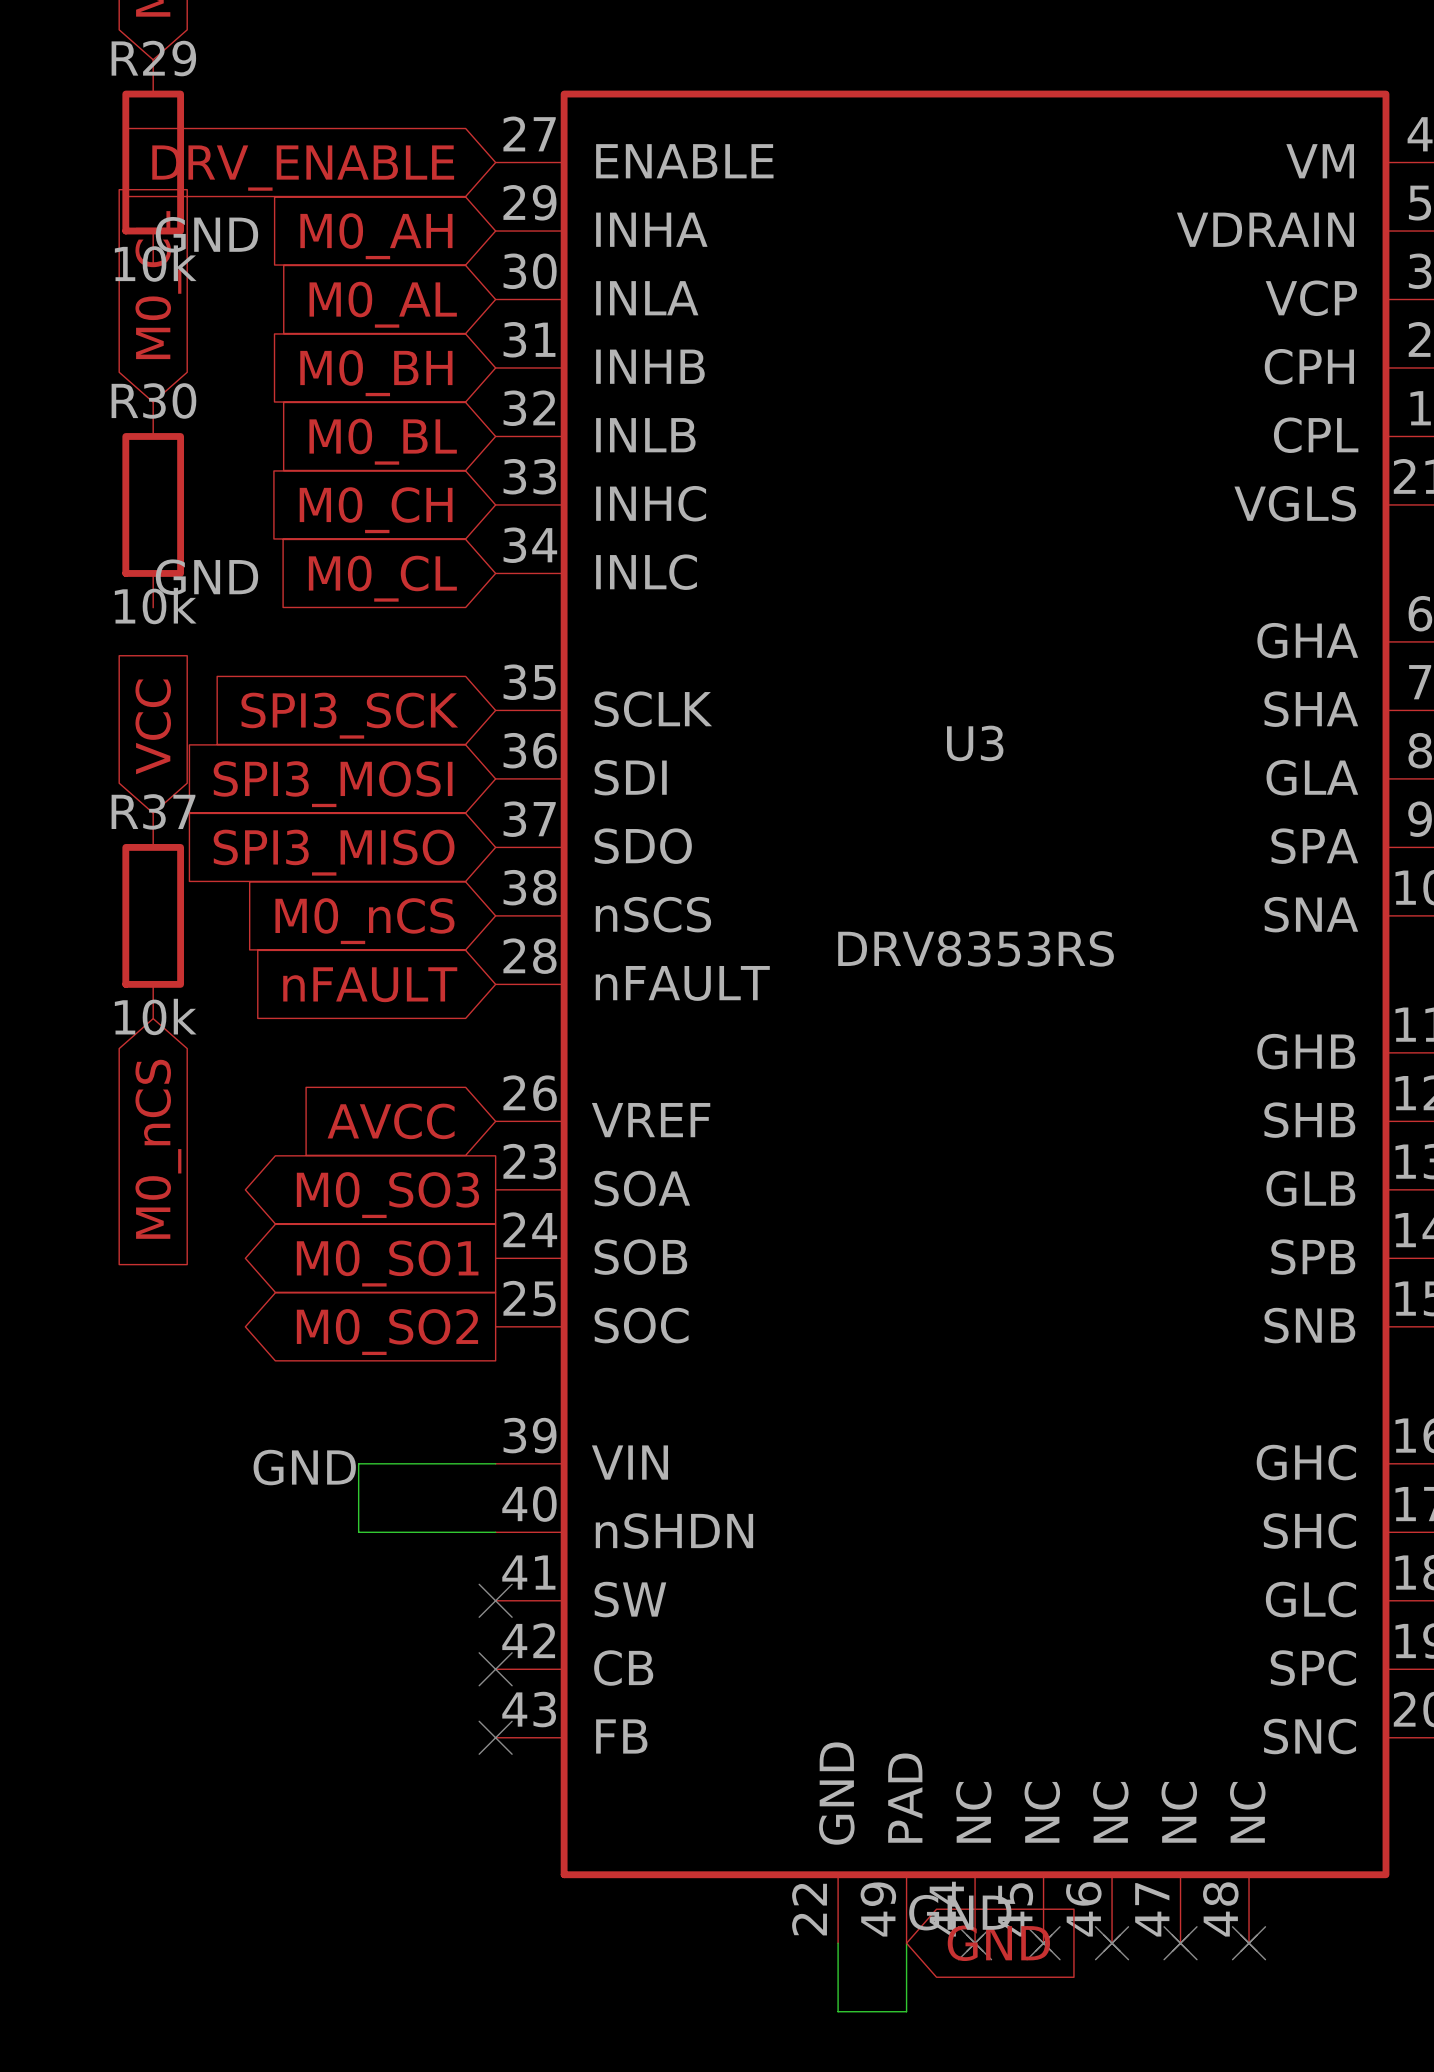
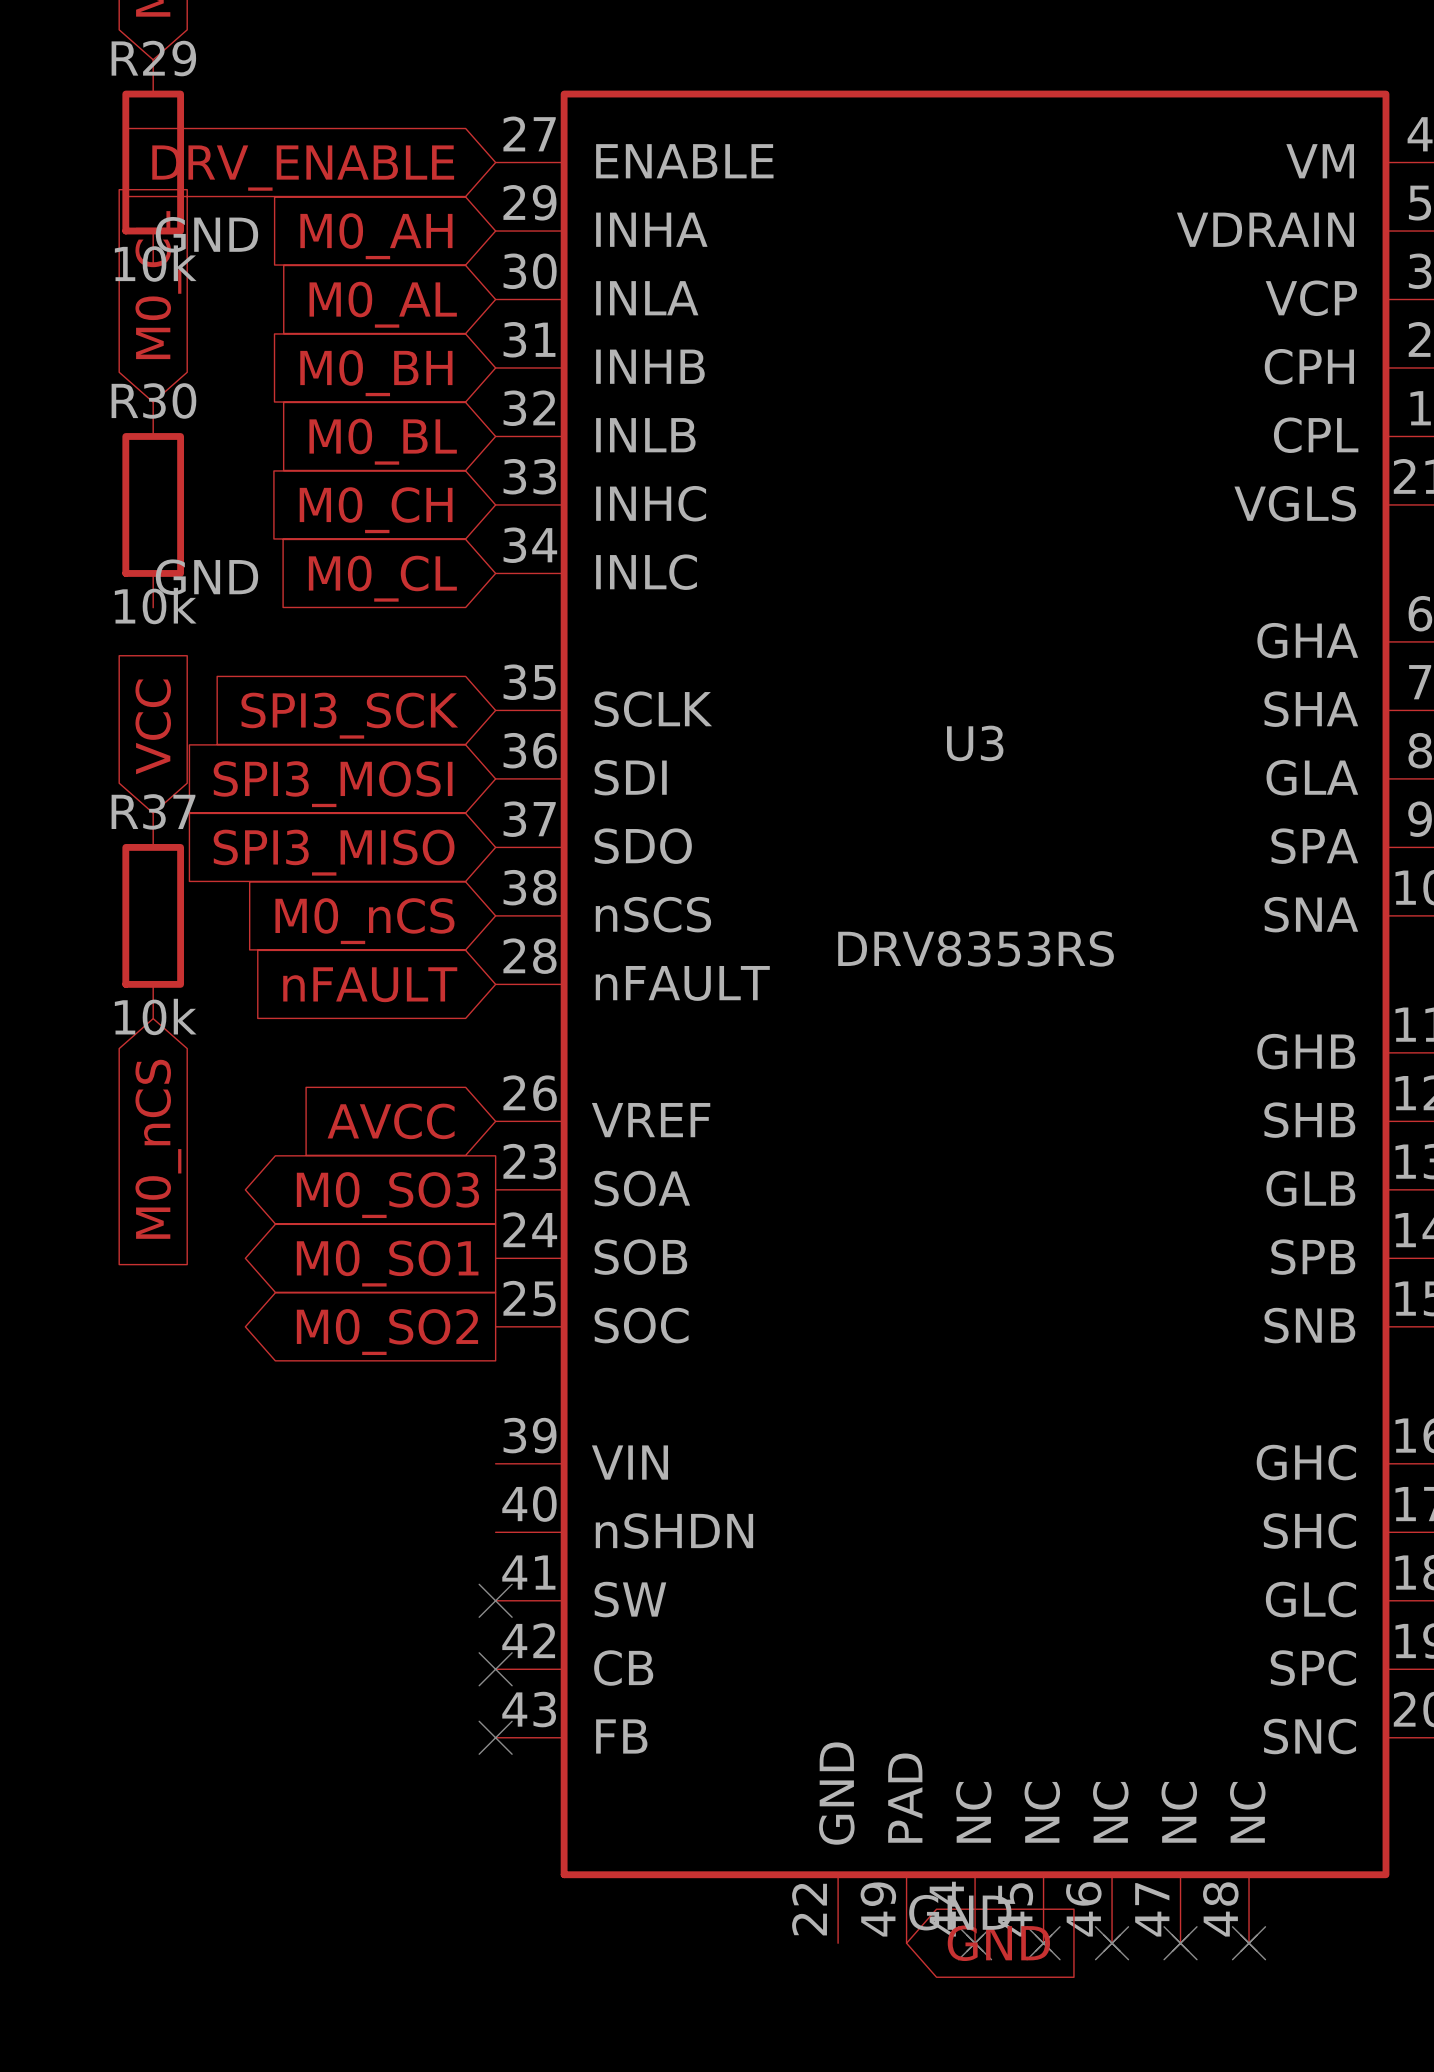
wire: (495, 1463) (358, 1463) (358, 1532) (495, 1532) -> none
label: GND (304, 1467) -> none
wire: (838, 1943) (838, 2011) (906, 2011) (906, 1943) -> none

